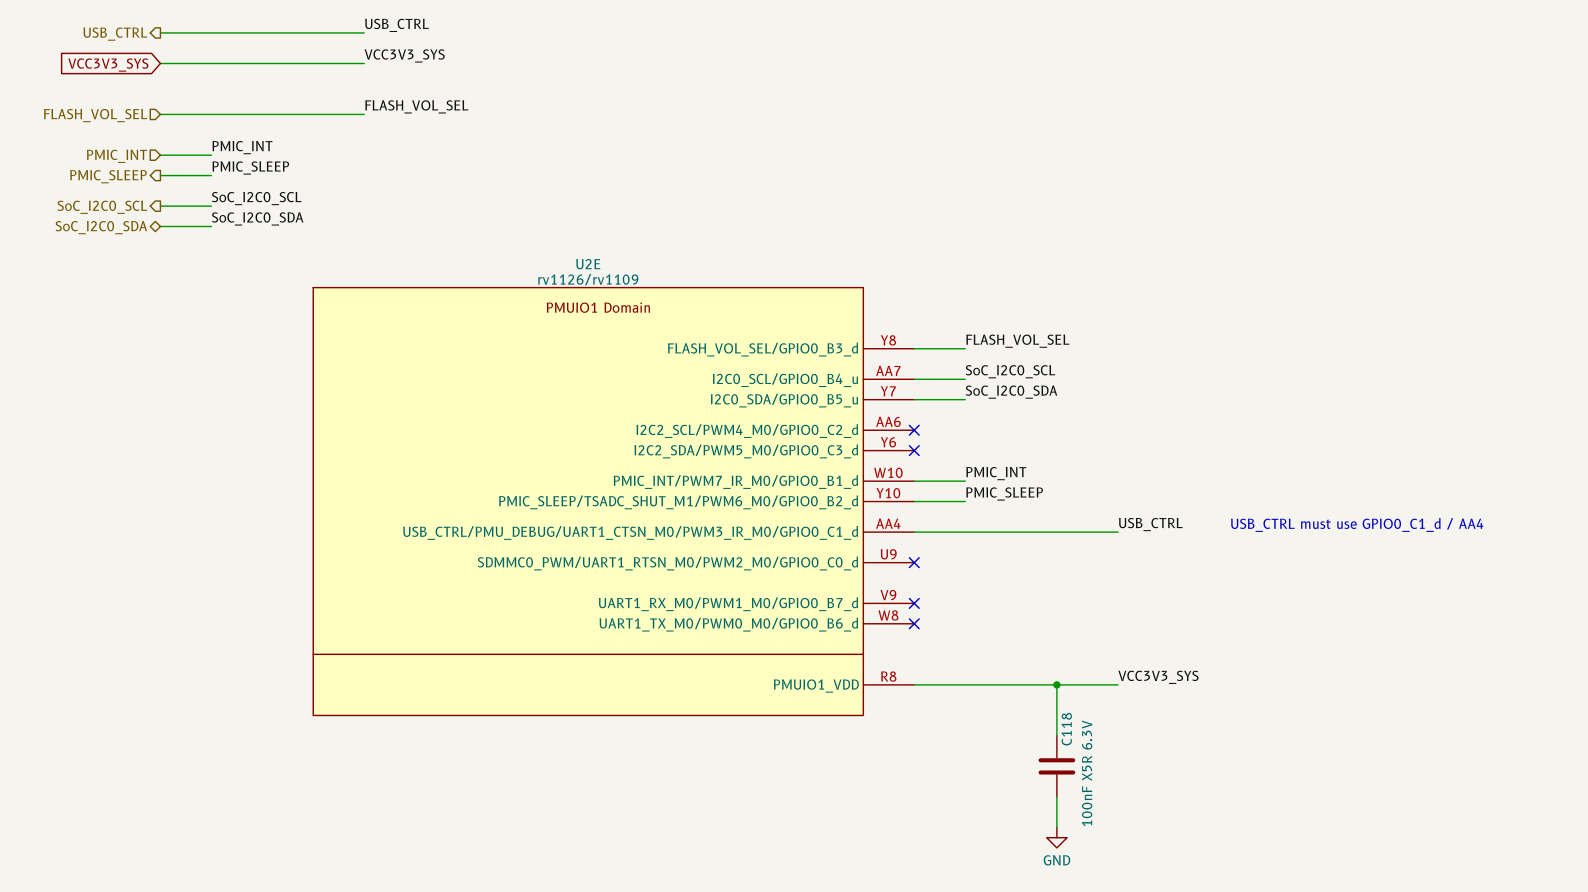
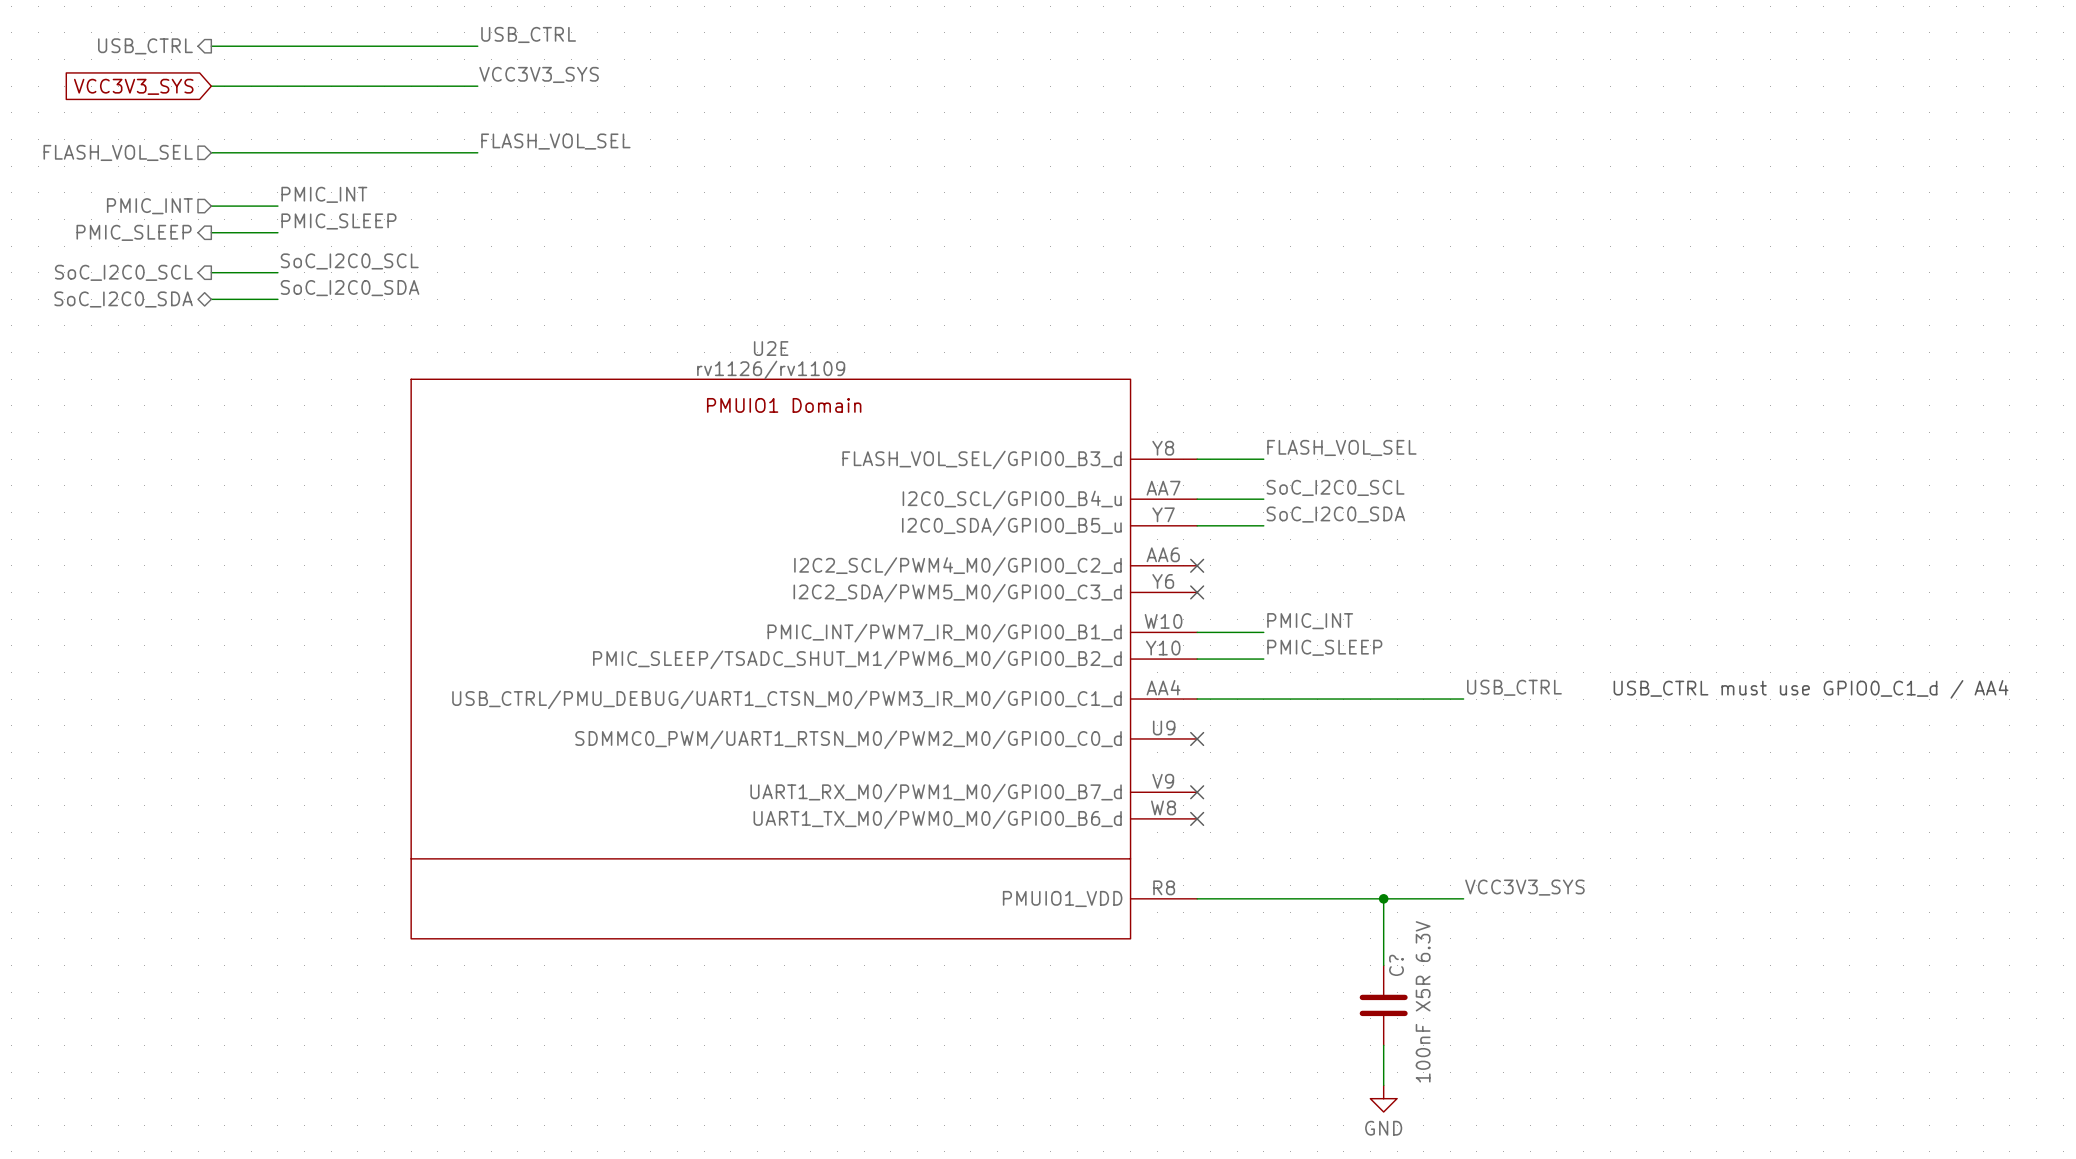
C118 name: C118 (1066, 729) -> C? (1396, 965)

